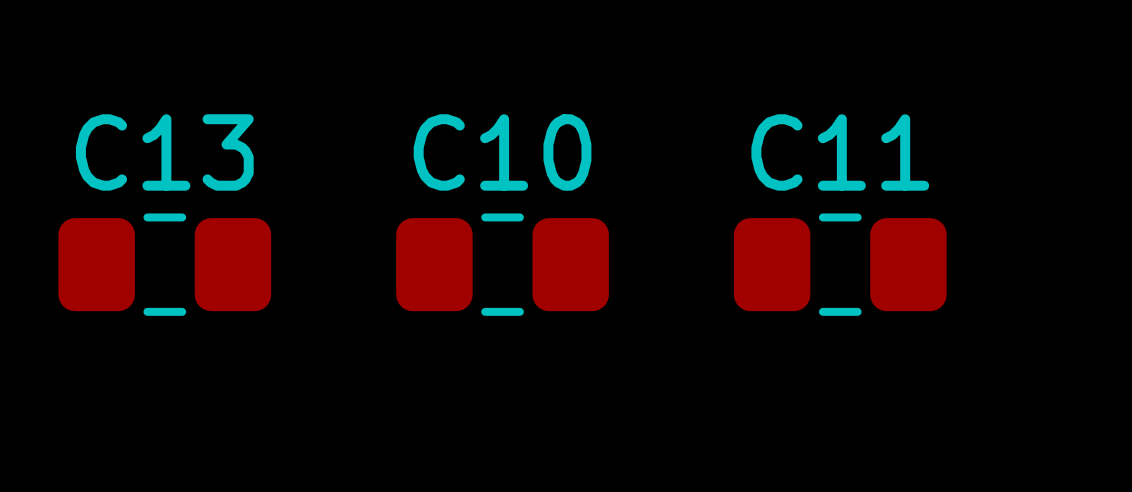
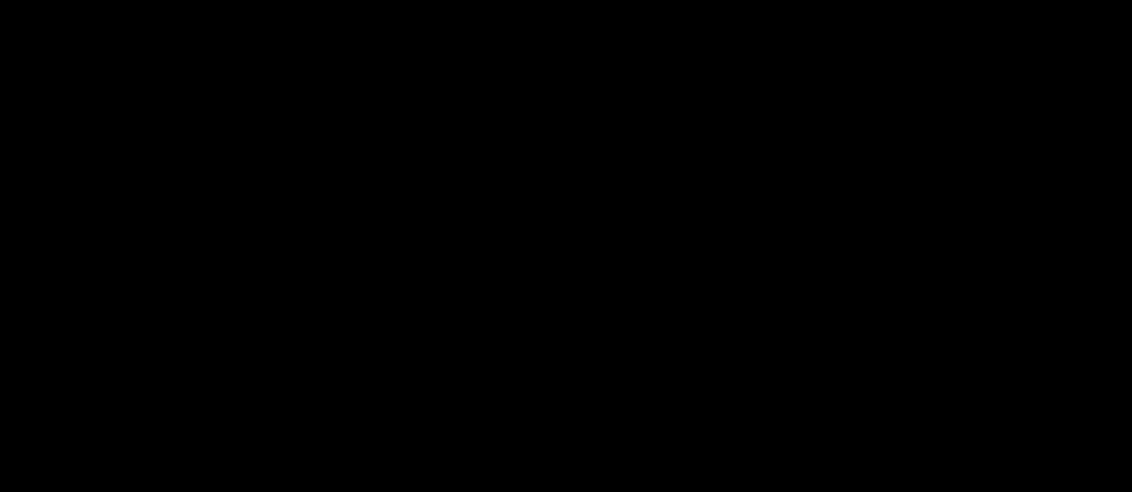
C13: (164, 264) -> none
C10: (502, 264) -> none
C11: (840, 264) -> none

